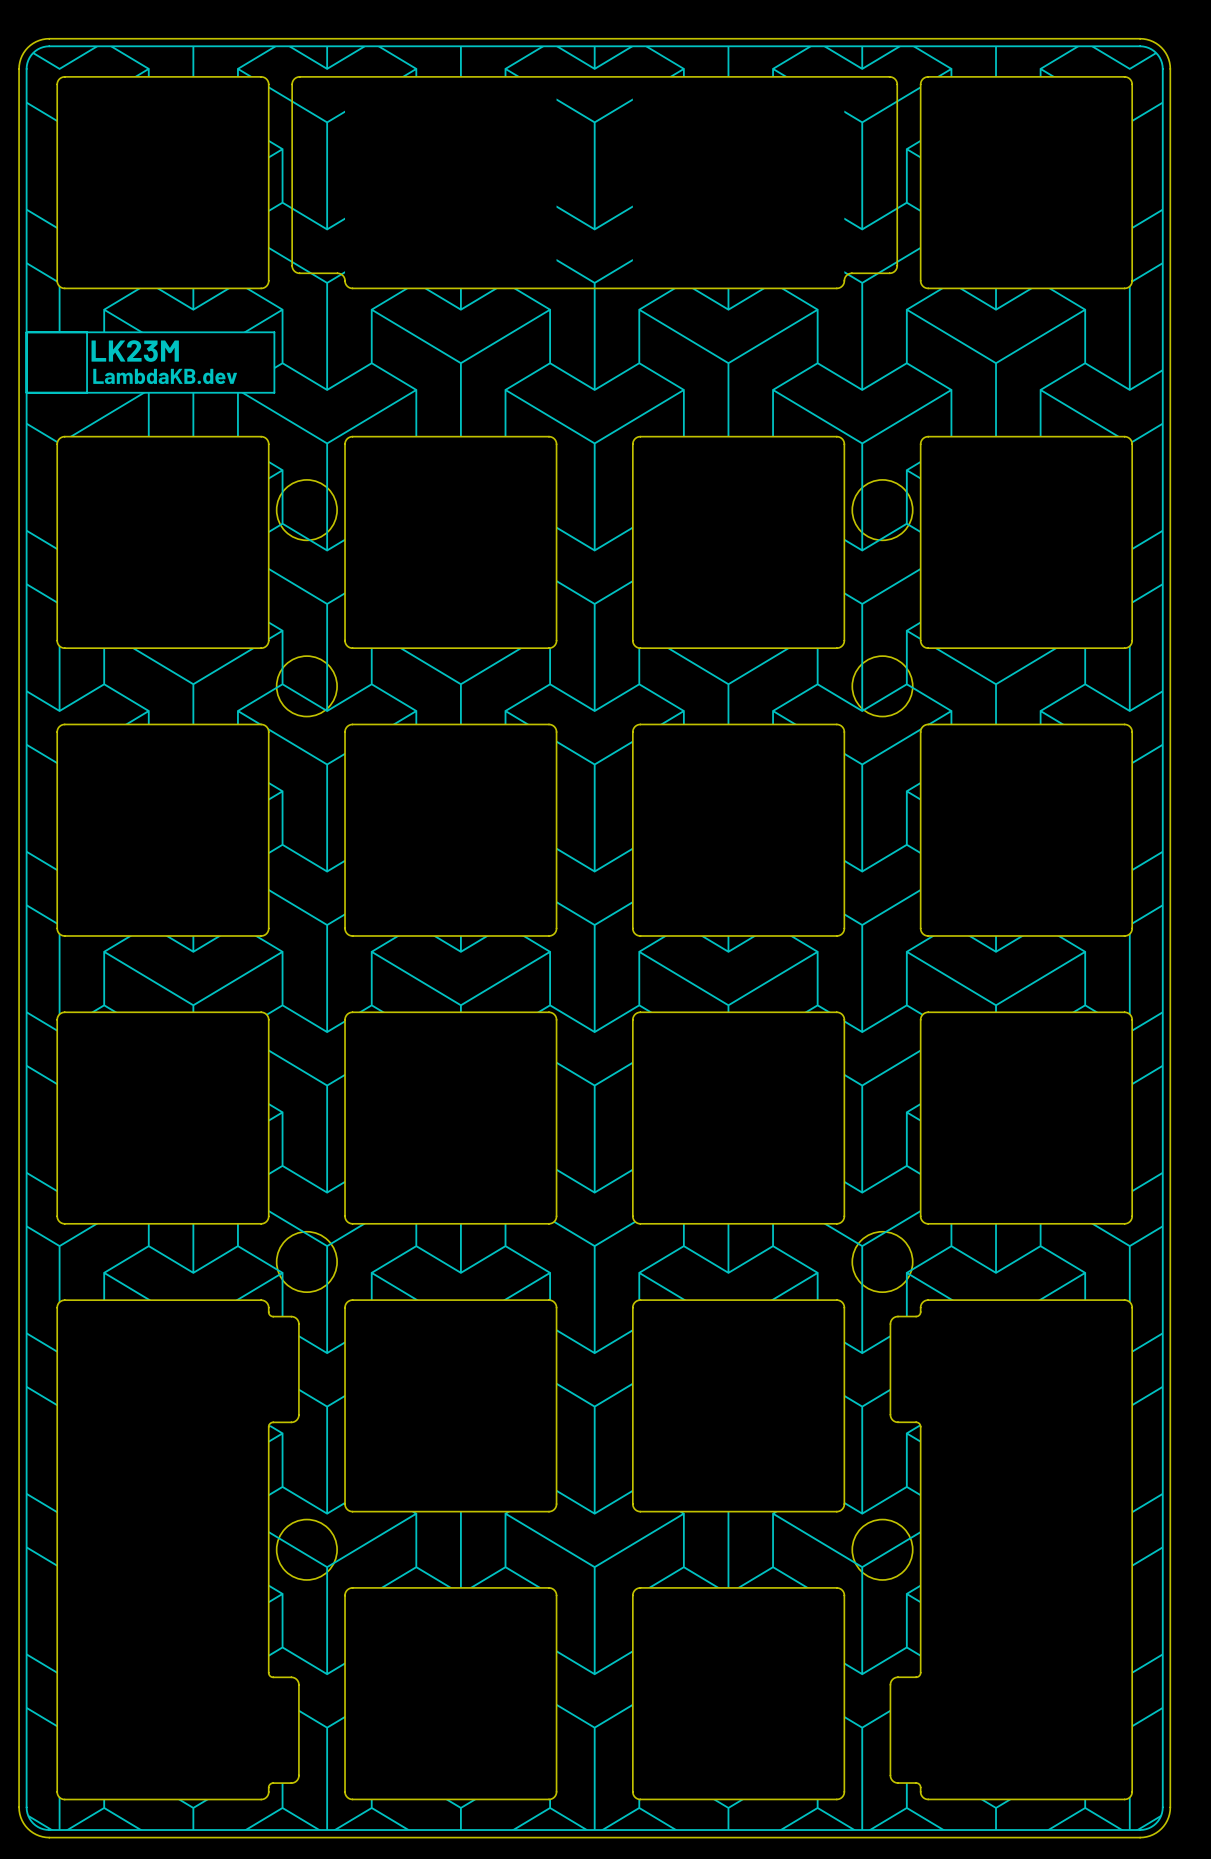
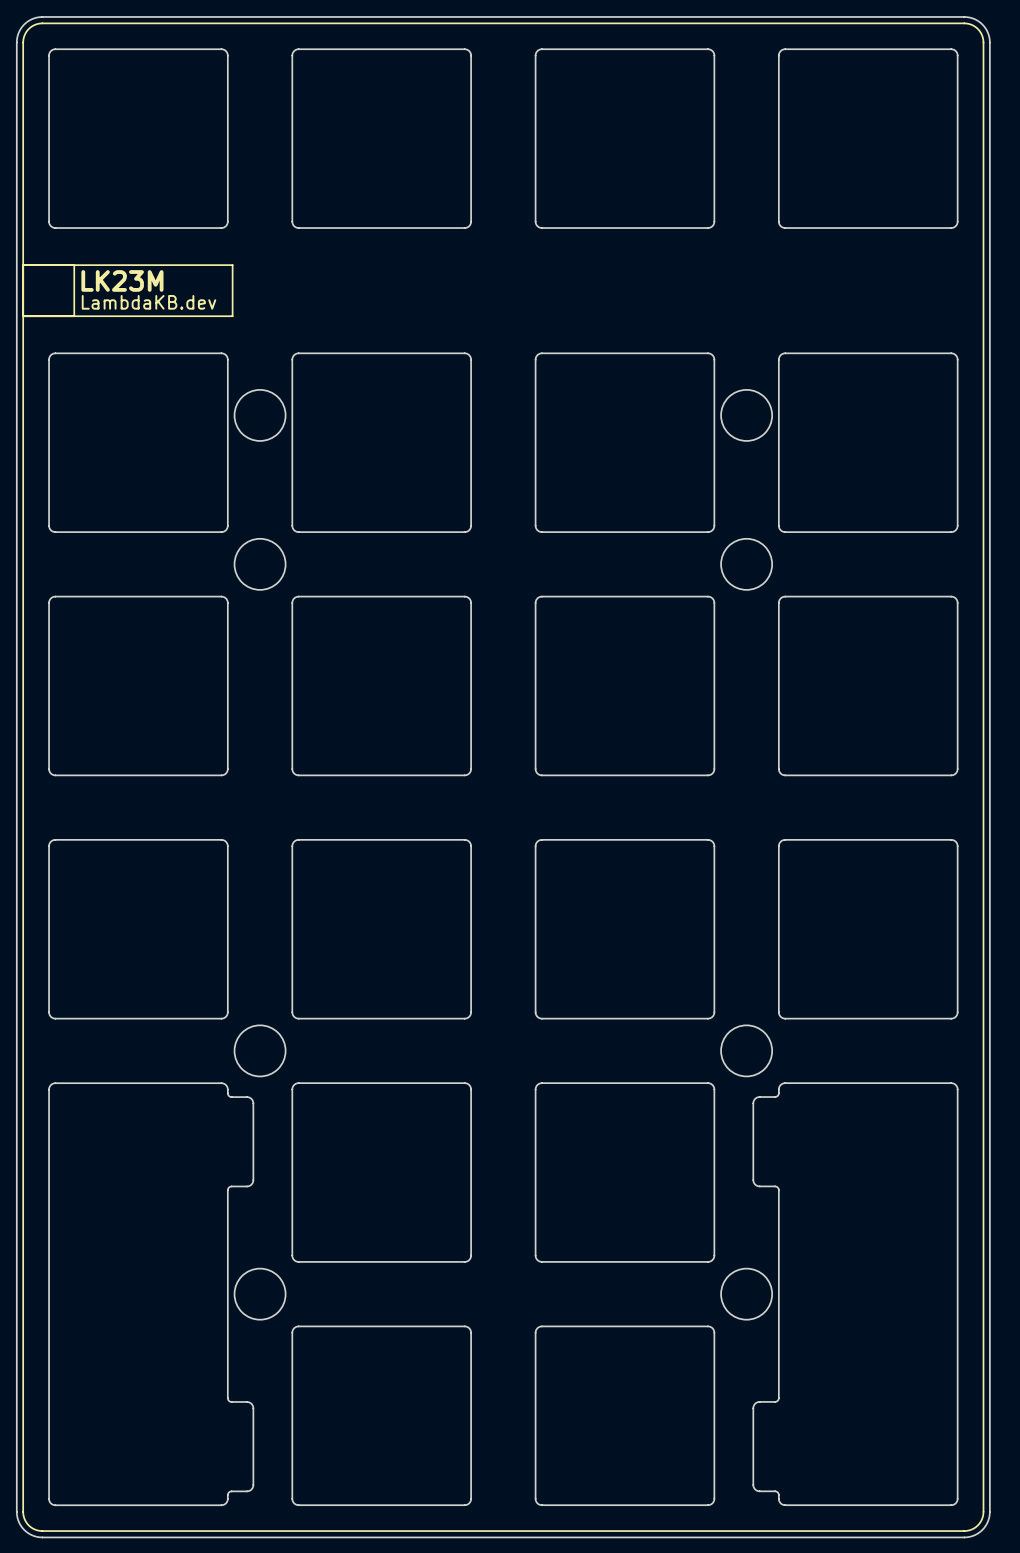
drawing: [26, 46, 1163, 1355] -> none
drawing: [32, 46, 150, 77] -> none
drawing: [192, 46, 195, 77] -> none
drawing: [460, 46, 462, 77] -> none
drawing: [504, 46, 685, 77] -> none
drawing: [727, 46, 730, 77] -> none
drawing: [995, 46, 997, 77] -> none
drawing: [1039, 46, 1157, 77] -> none
board edge: (352, 76) (298, 76) (293, 79) (292, 84) (292, 267) (298, 273) (339, 273) (343, 276) (345, 280) -> (298, 49) (294, 51) (292, 55) (292, 221)
board edge: (548, 76) (640, 76) -> (464, 49) (469, 51) (471, 55) (471, 221) (469, 226) (464, 228)
board edge: (836, 76) (890, 76) (895, 79) (897, 84) (896, 267) (890, 273) (849, 273) (845, 276) (844, 280) -> (707, 49) (712, 51) (714, 55) (714, 221)
drawing: [26, 101, 58, 123] -> none
drawing: [1132, 101, 1163, 123] -> none
drawing: [26, 208, 58, 230] -> none
drawing: [26, 262, 61, 333] -> none
board edge: (548, 288) (640, 288) -> (541, 49) (537, 51) (535, 55) (535, 221) (537, 226) (541, 228)
drawing: [26, 392, 150, 444] -> none
drawing: [192, 392, 195, 437] -> none
drawing: [26, 529, 58, 551] -> none
drawing: [26, 583, 58, 604] -> none
drawing: [1132, 583, 1163, 604] -> none
drawing: [26, 743, 58, 765] -> none
drawing: [1132, 743, 1163, 765] -> none
drawing: [26, 850, 58, 872] -> none
drawing: [1132, 850, 1163, 872] -> none
drawing: [26, 904, 61, 1032] -> none
drawing: [1128, 904, 1163, 1032] -> none
drawing: [556, 1061, 633, 1194] -> none
drawing: [26, 1064, 58, 1086] -> none
drawing: [1132, 1064, 1163, 1086] -> none
drawing: [26, 1171, 58, 1193] -> none
drawing: [1132, 1171, 1163, 1193] -> none
drawing: [26, 1332, 58, 1353] -> none
drawing: [1132, 1332, 1163, 1353] -> none
drawing: [268, 1382, 921, 1676] -> none
drawing: [26, 1385, 58, 1407] -> none
drawing: [1132, 1385, 1163, 1407] -> none
drawing: [26, 1492, 58, 1514] -> none
drawing: [1132, 1492, 1163, 1514] -> none
drawing: [26, 1546, 58, 1567] -> none
drawing: [1132, 1546, 1163, 1567] -> none
drawing: [26, 1653, 58, 1674] -> none
drawing: [1132, 1653, 1163, 1674] -> none
drawing: [511, 1703, 678, 1831] -> none
drawing: [26, 1706, 58, 1728] -> none
drawing: [1132, 1706, 1163, 1728] -> none
drawing: [243, 1709, 411, 1831] -> none
drawing: [779, 1709, 946, 1831] -> none
drawing: [28, 1796, 143, 1831] -> none
drawing: [1046, 1796, 1162, 1831] -> none
drawing: [177, 1799, 210, 1831] -> none
drawing: [444, 1799, 477, 1831] -> none
drawing: [712, 1799, 745, 1831] -> none
drawing: [980, 1799, 1012, 1831] -> none

